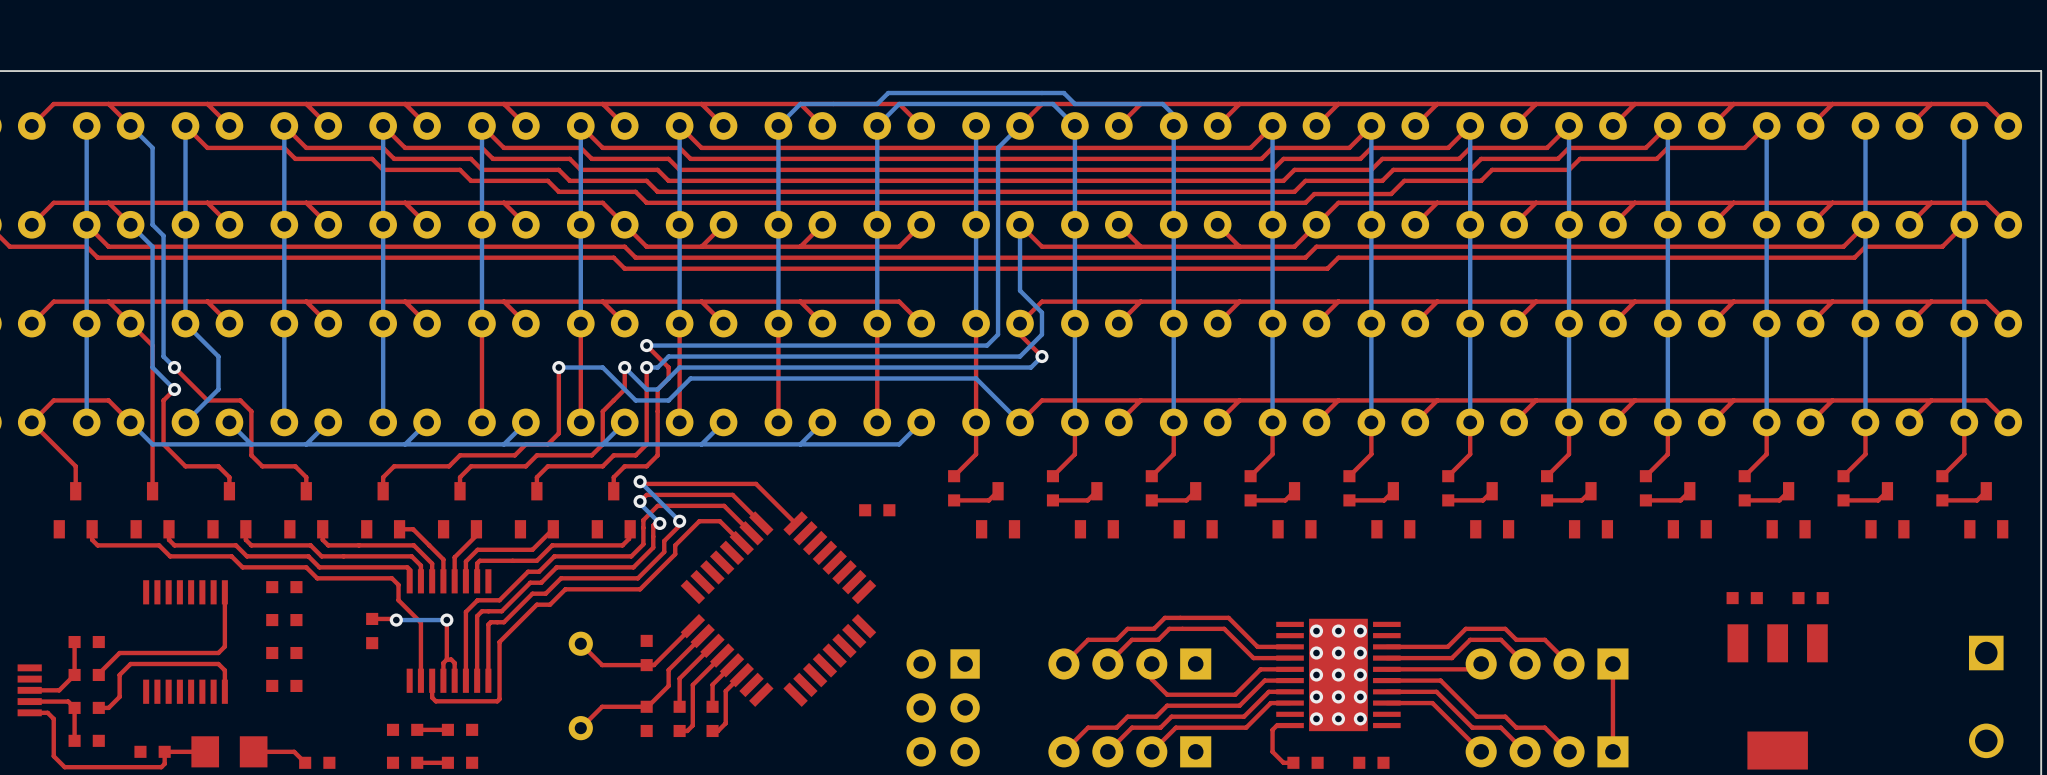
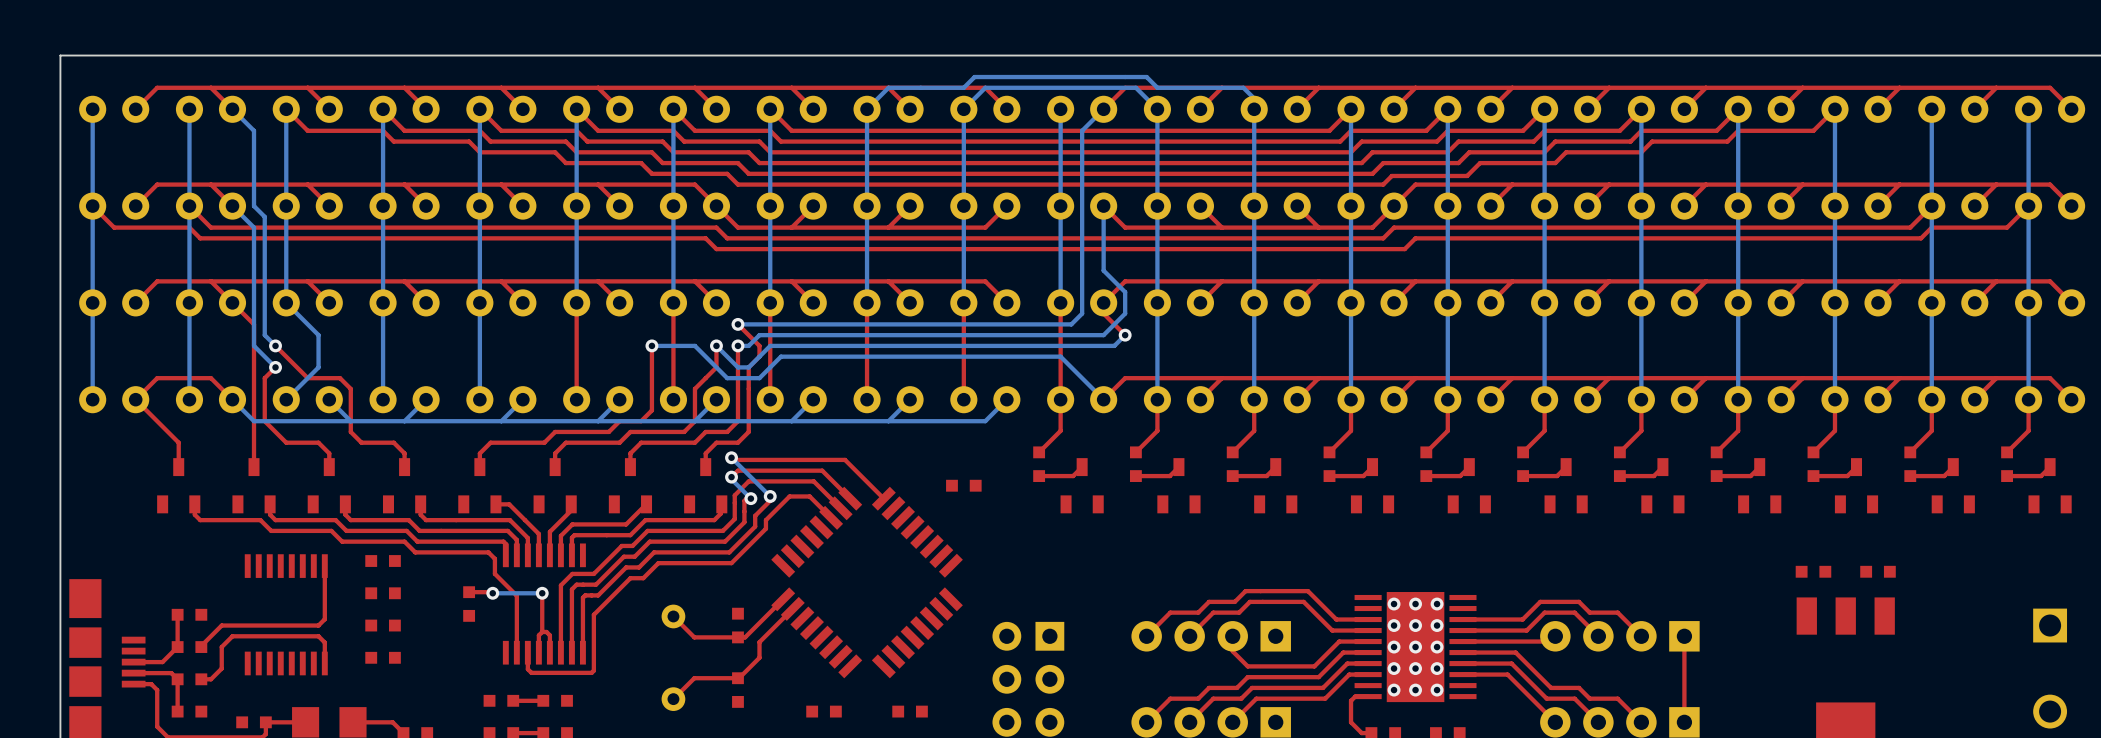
top track: (712, 645) (679, 678) (679, 706) (681, 703) (679, 705) -> none
top track: (722, 655) (692, 684) (692, 725) (687, 730) (679, 730) -> none
top track: (731, 665) (712, 684) (712, 706) -> none
top track: (741, 675) (725, 691) (725, 723) (718, 730) (712, 730) -> none
part: (679, 718) -> none
part: (712, 718) -> none
part: none -> (824, 711)
part: none -> (910, 711)

